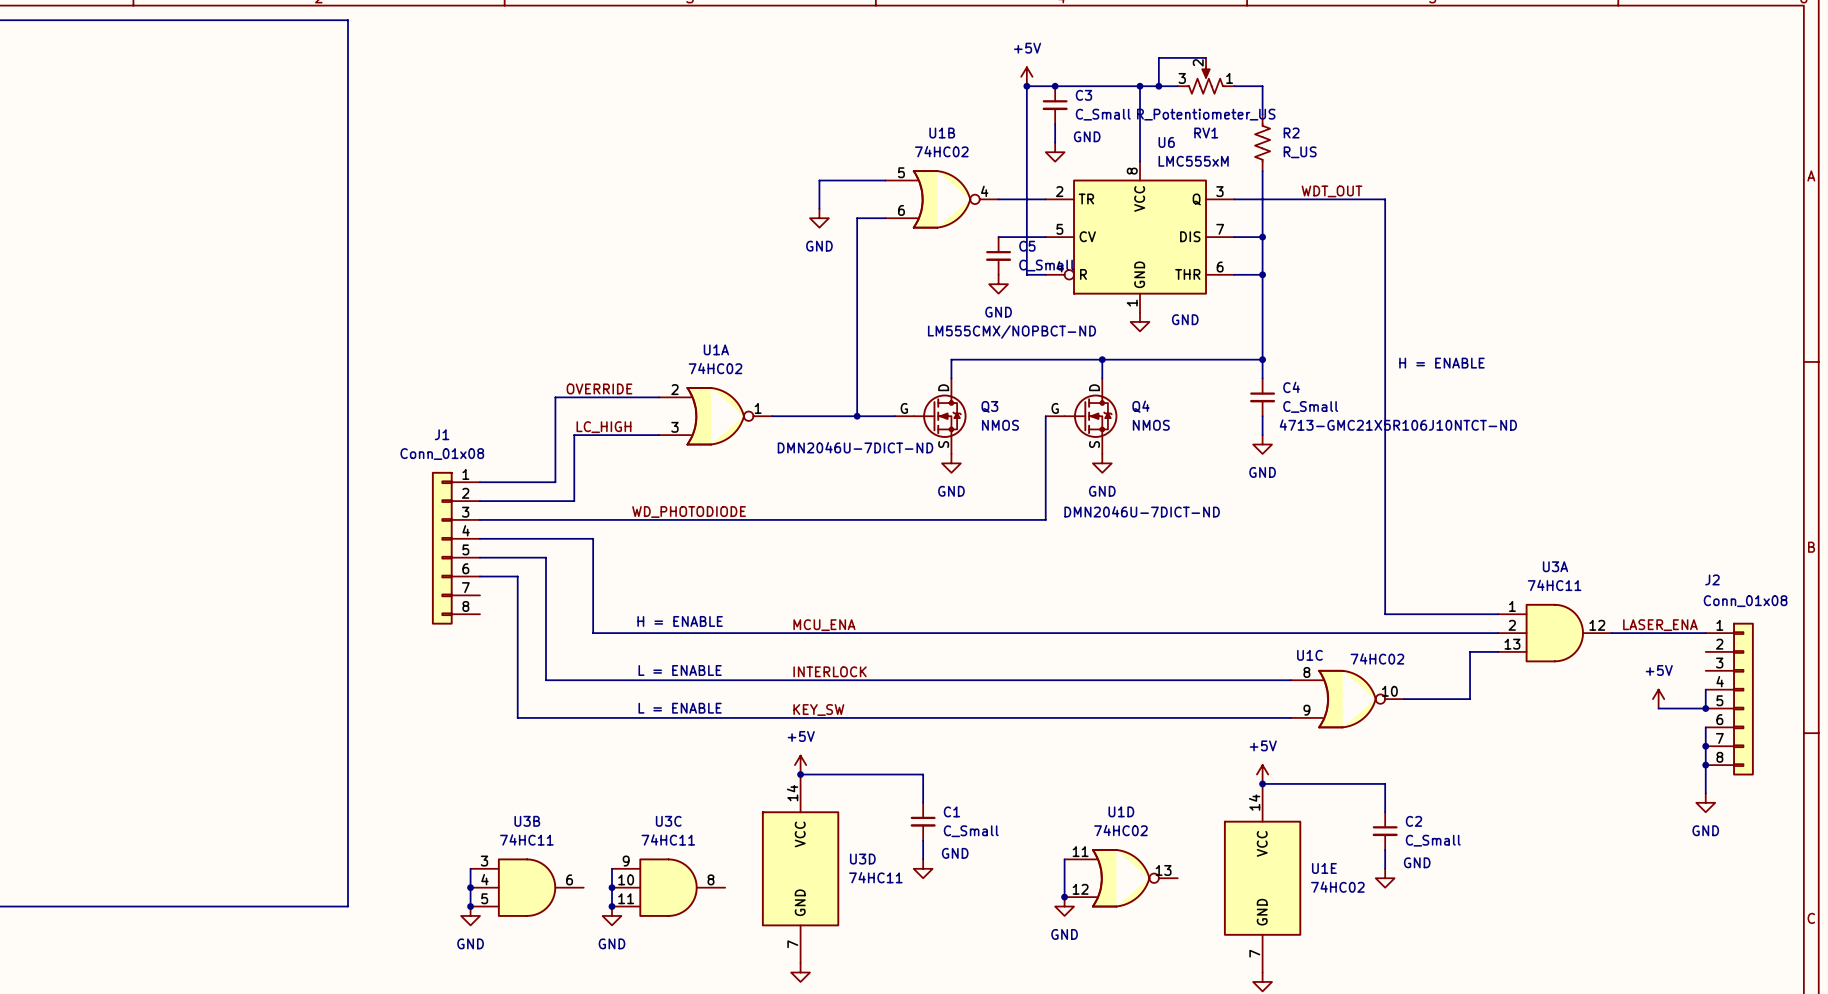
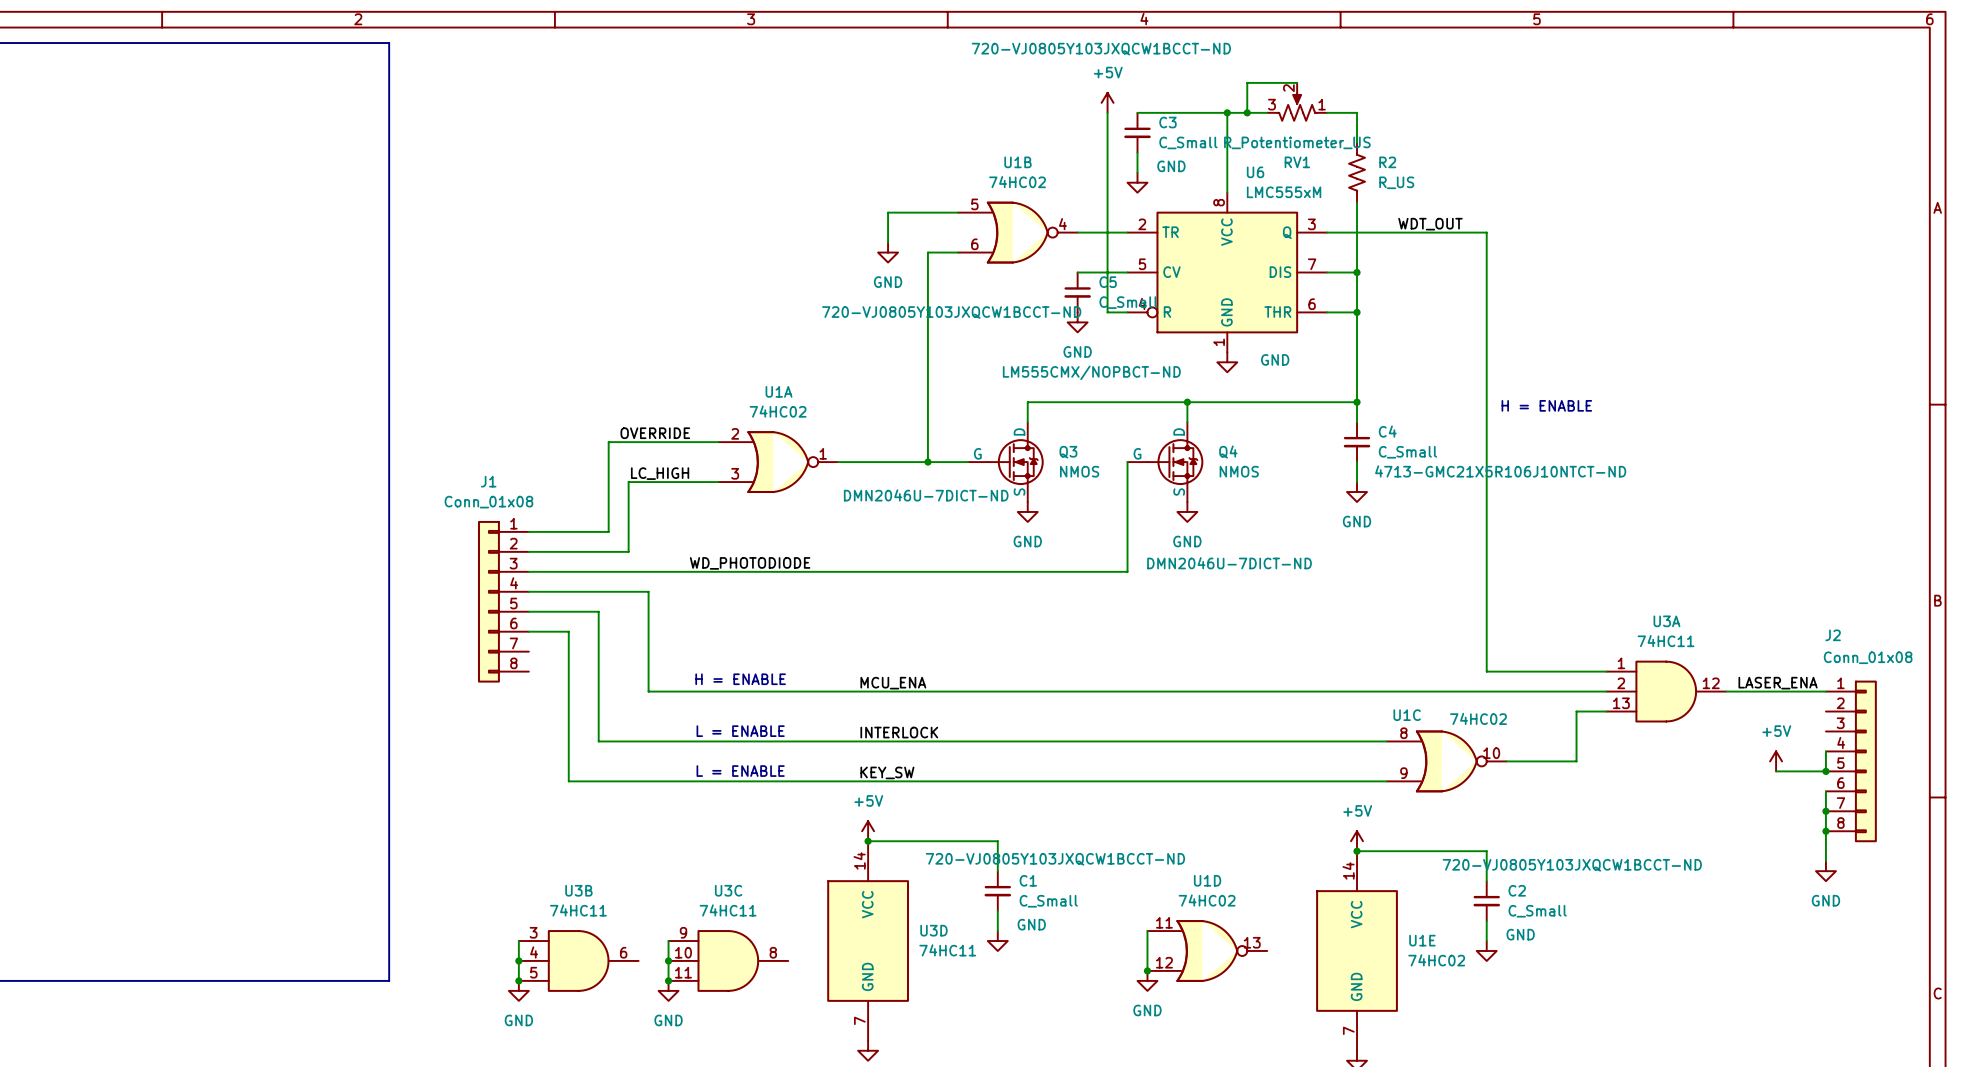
C3 text: none -> 720-VJ0805Y103JXQCW1BCCT-ND (1101, 49)
wire: (1026, 86) (1055, 86) -> none
junction: (1026, 86) -> none
junction: (1055, 86) -> none
C5 text: none -> 720-VJ0805Y103JXQCW1BCCT-ND (951, 312)
C1 text: none -> 720-VJ0805Y103JXQCW1BCCT-ND (1055, 859)
C2 text: none -> 720-VJ0805Y103JXQCW1BCCT-ND (1572, 865)

